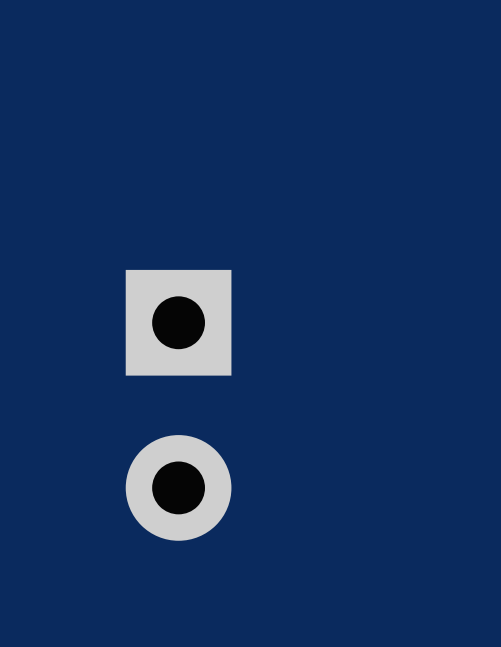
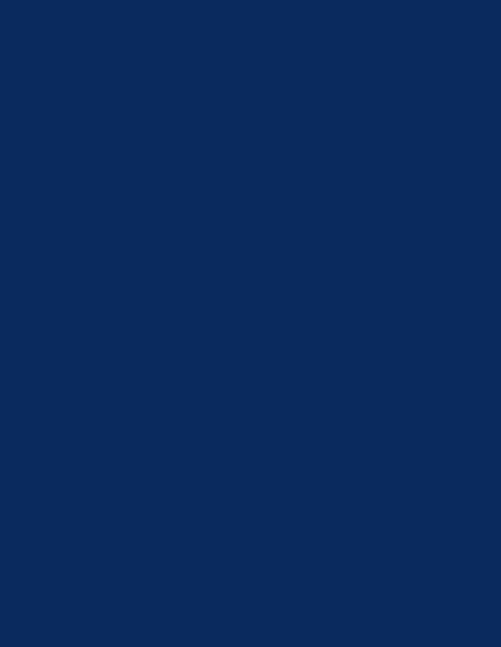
part: (178, 405) -> none

